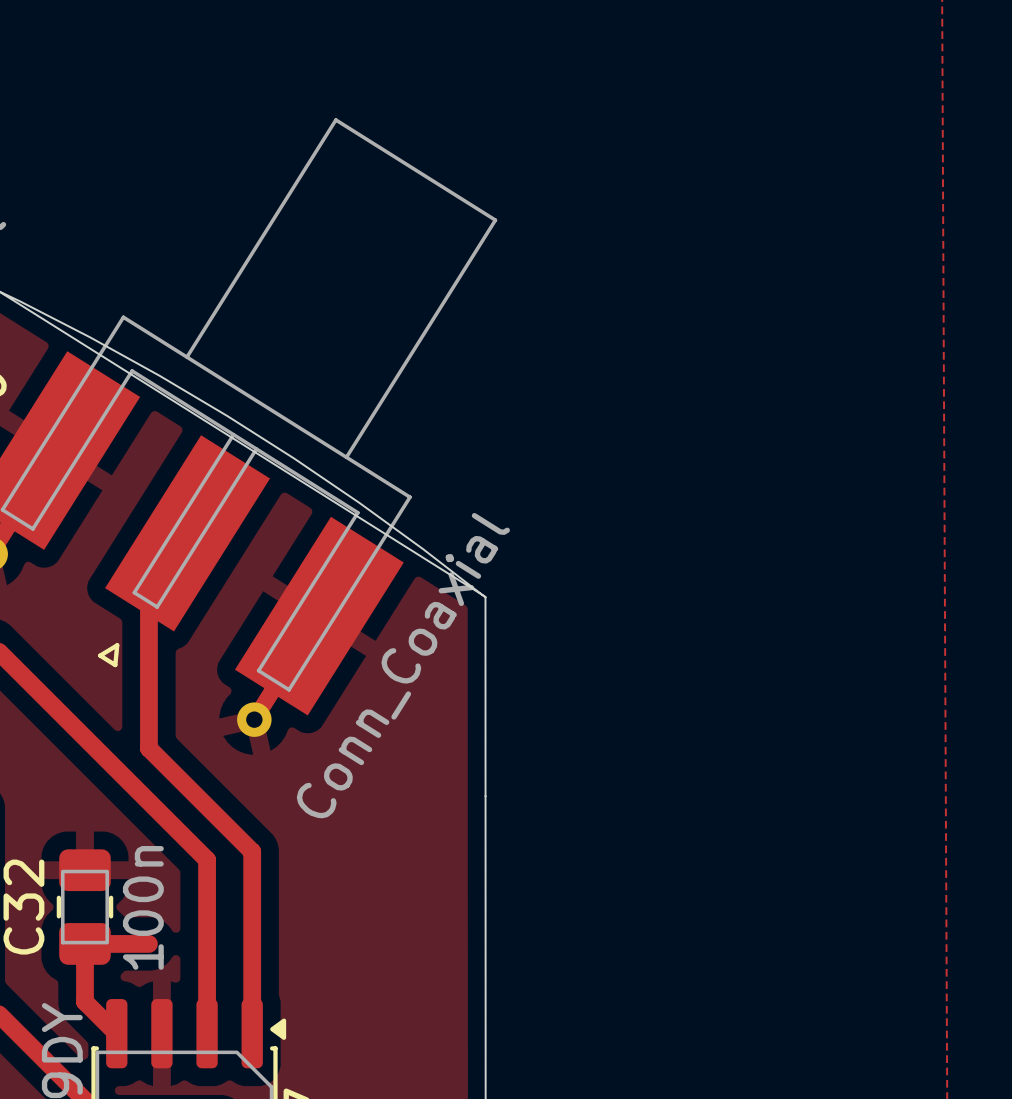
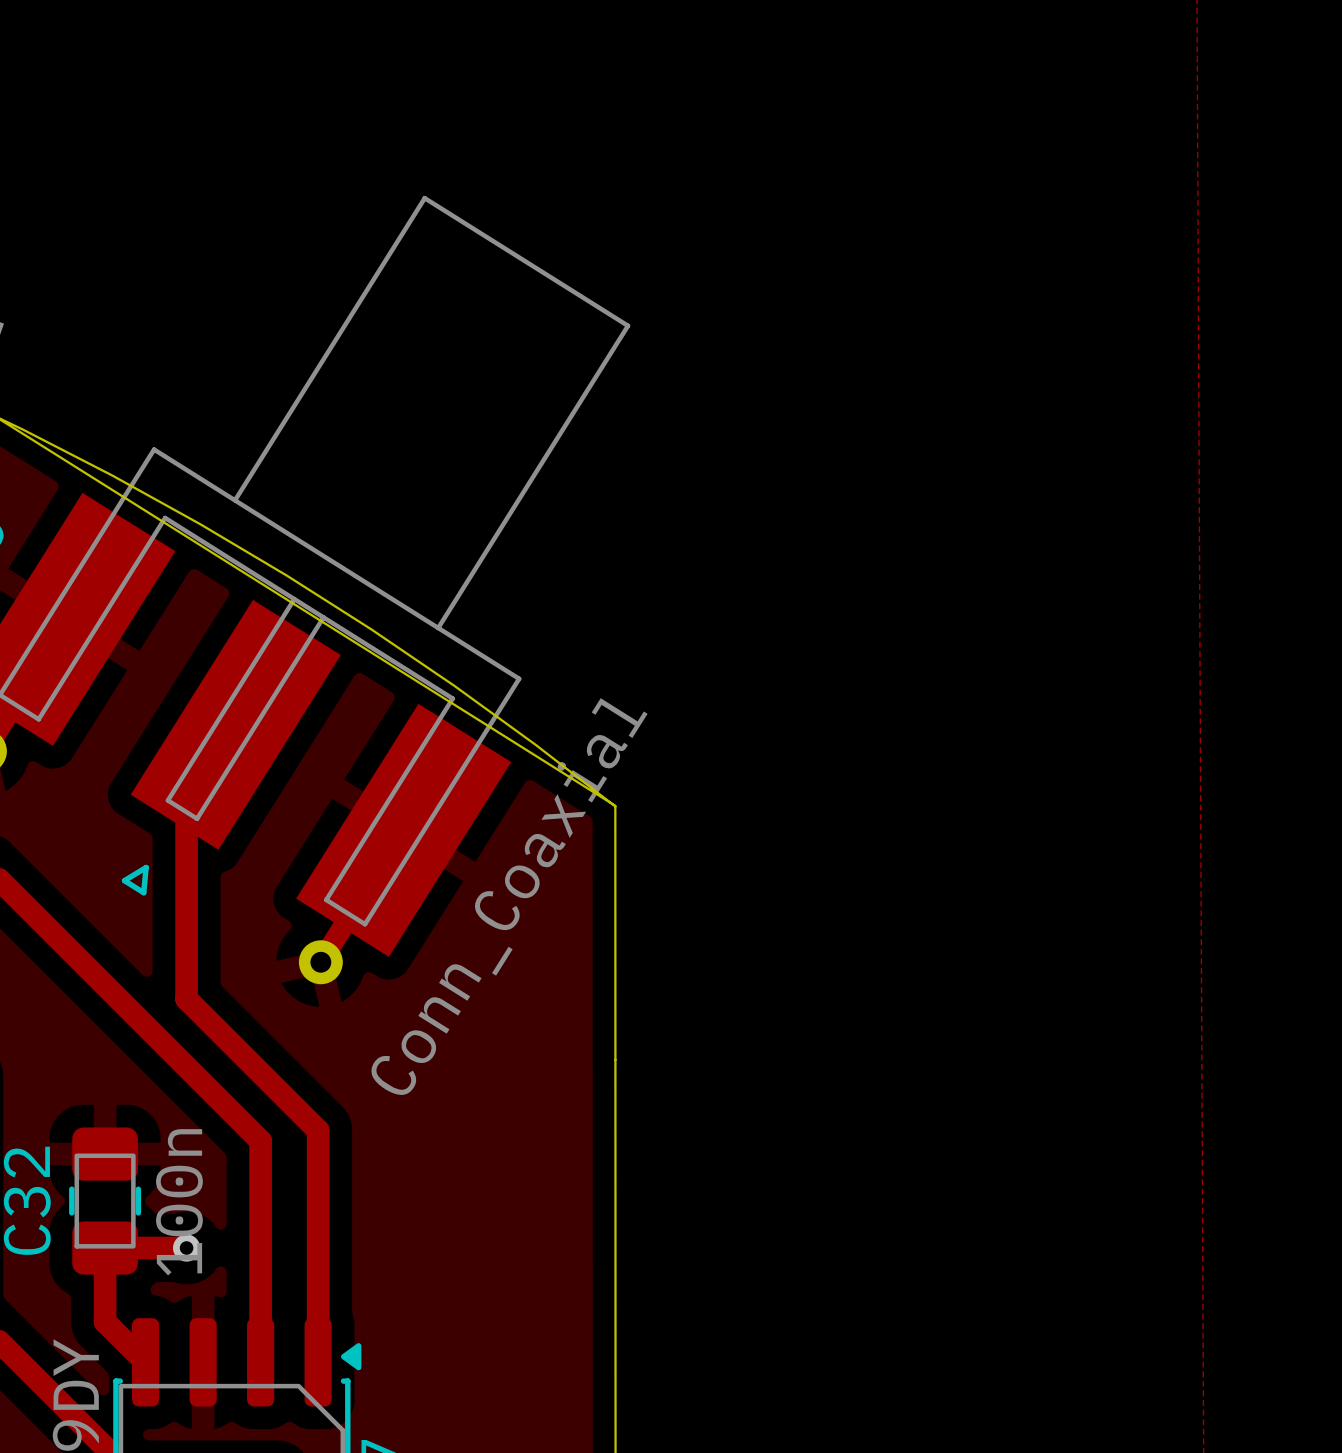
via: none -> (186, 1248)

